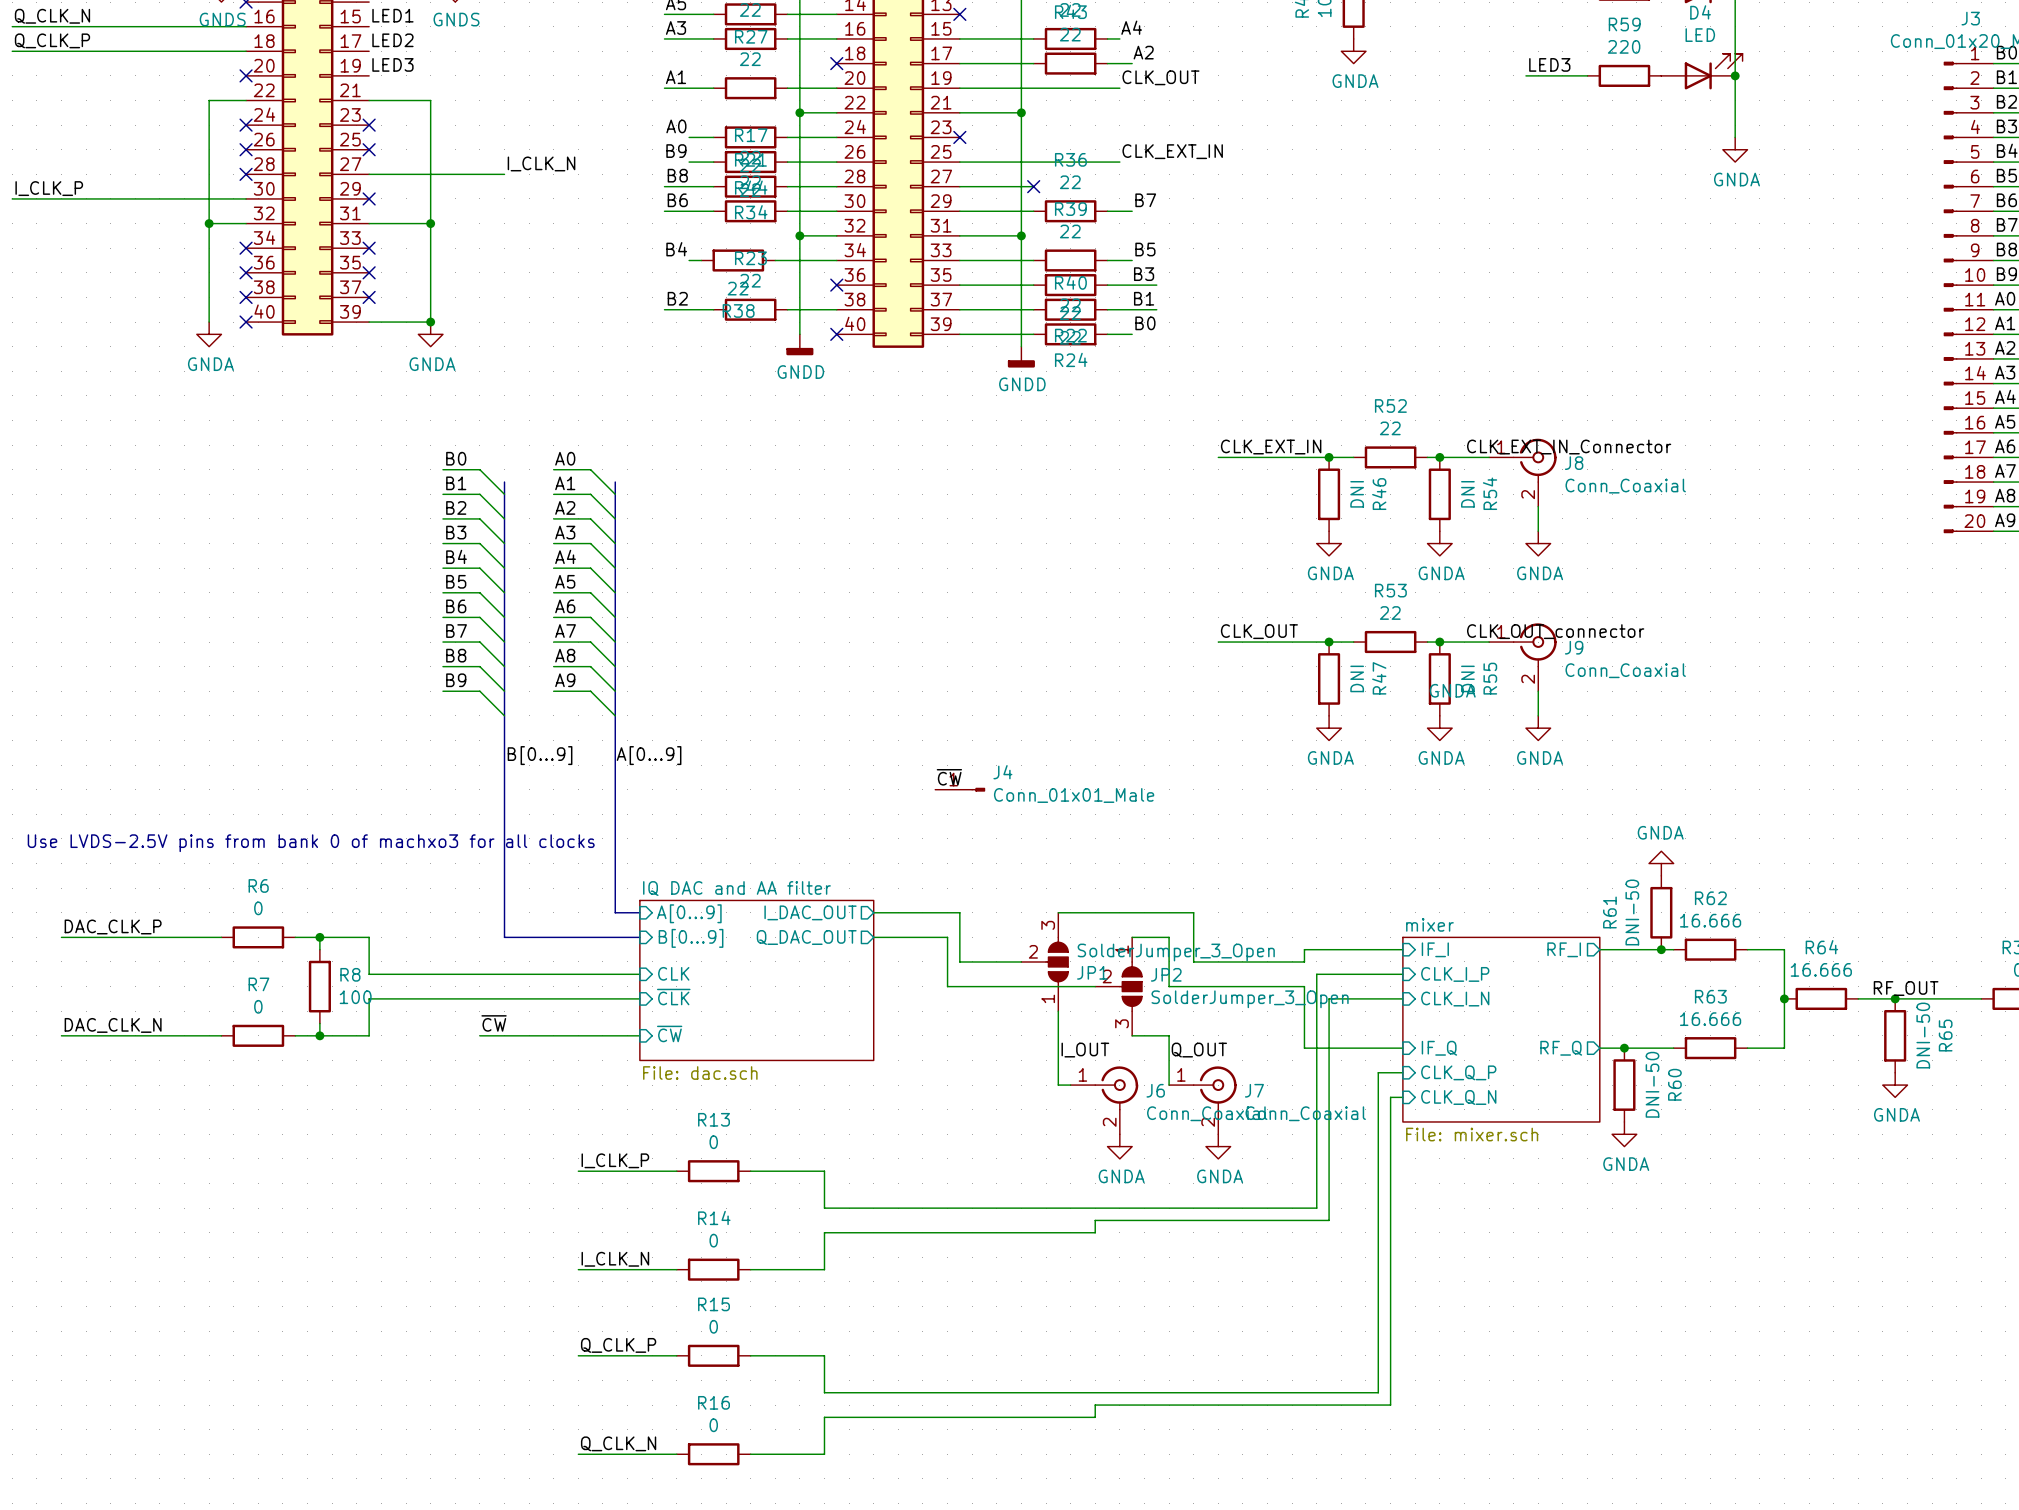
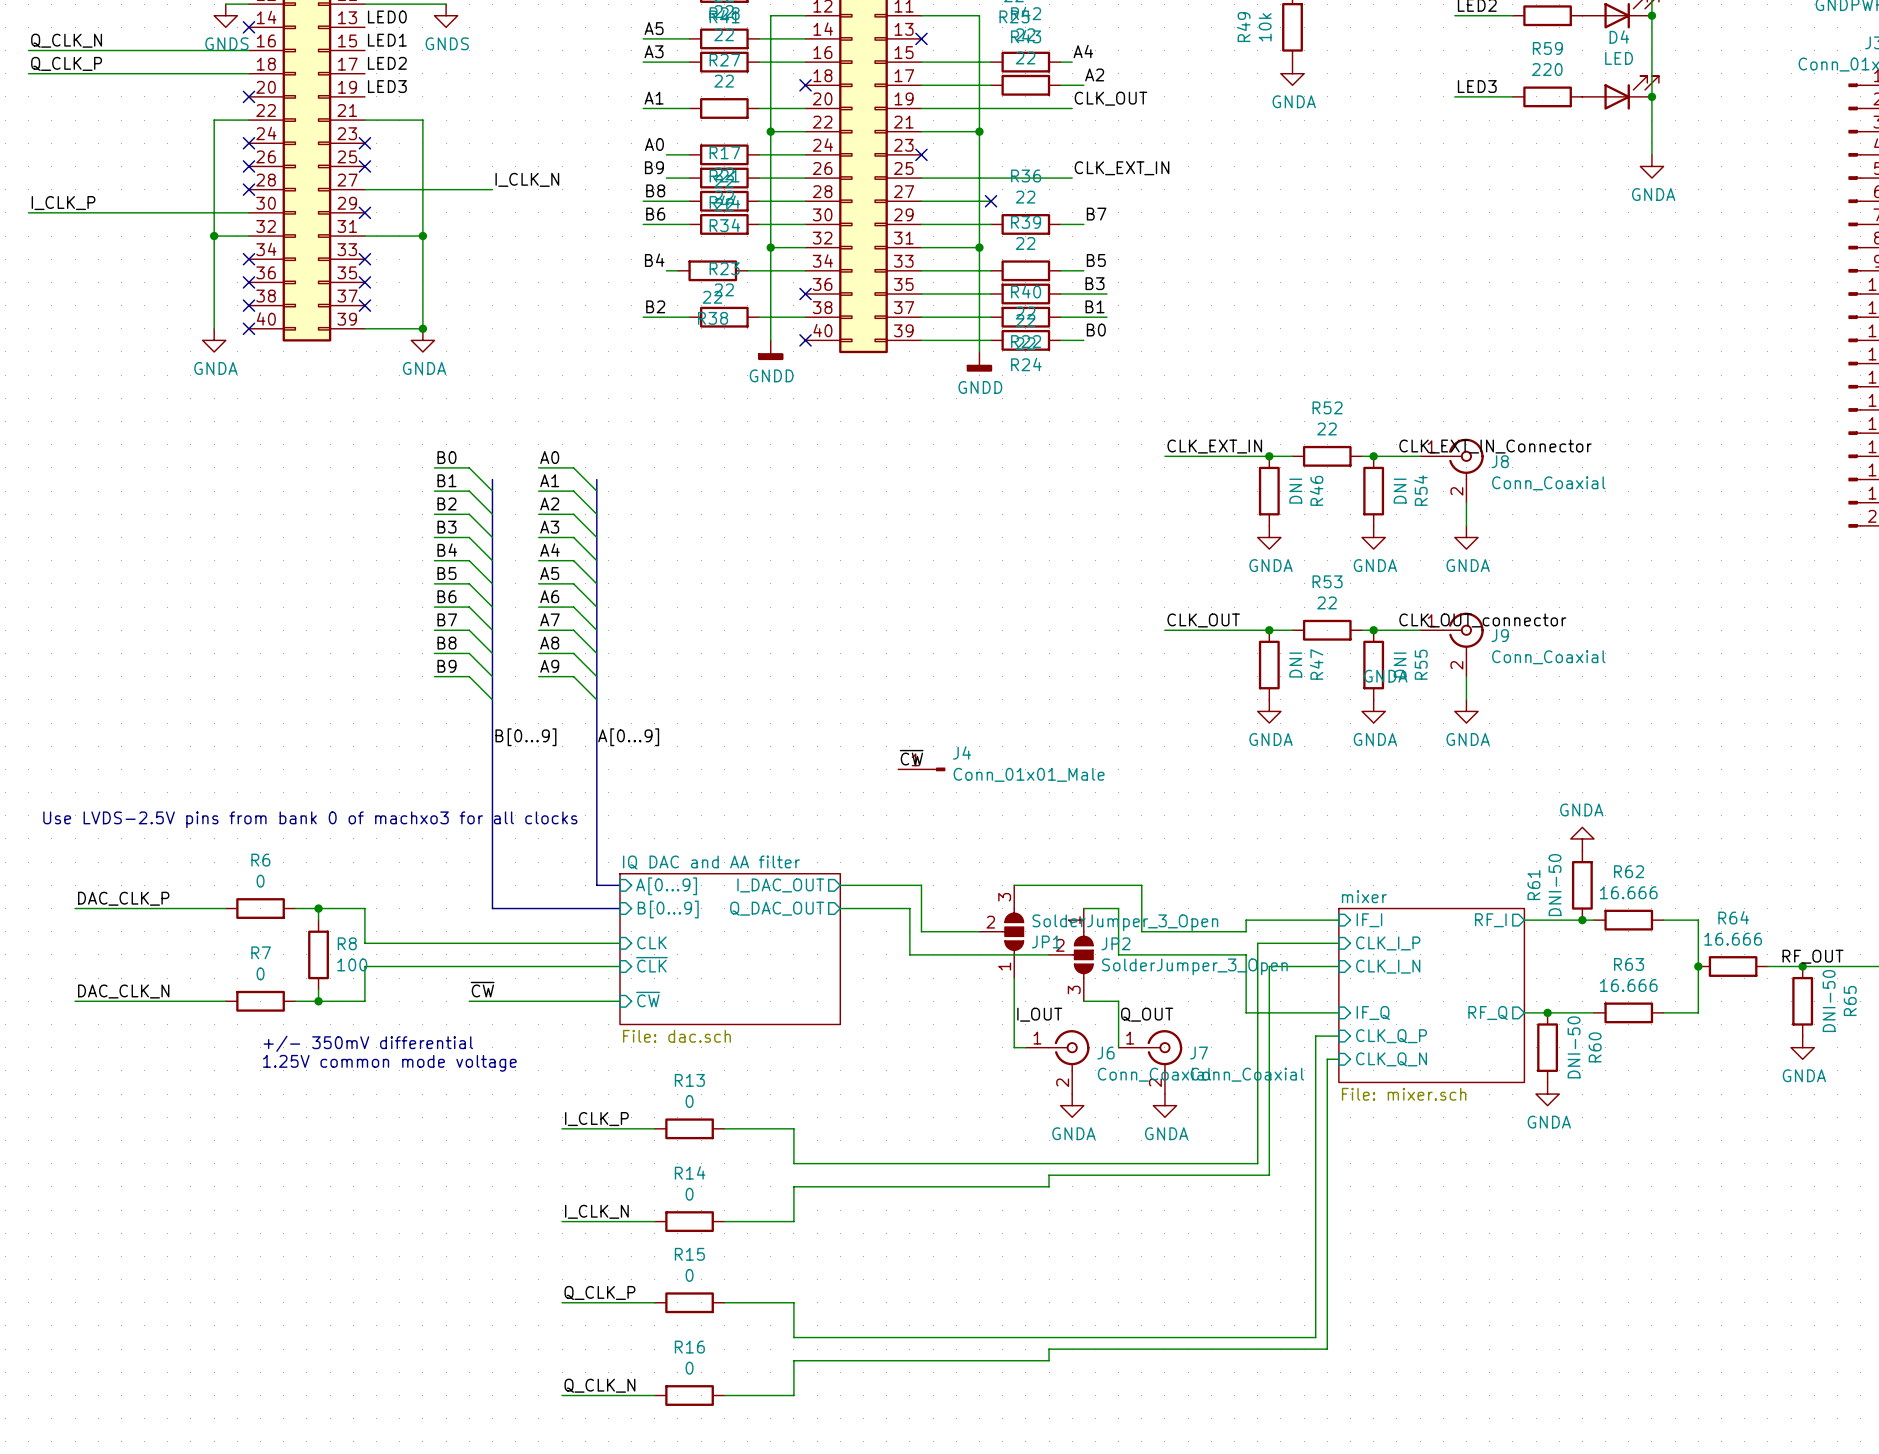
text: none -> +/- 350mV differential (368, 1043)
text: none -> 1.25V common mode voltage (389, 1063)

